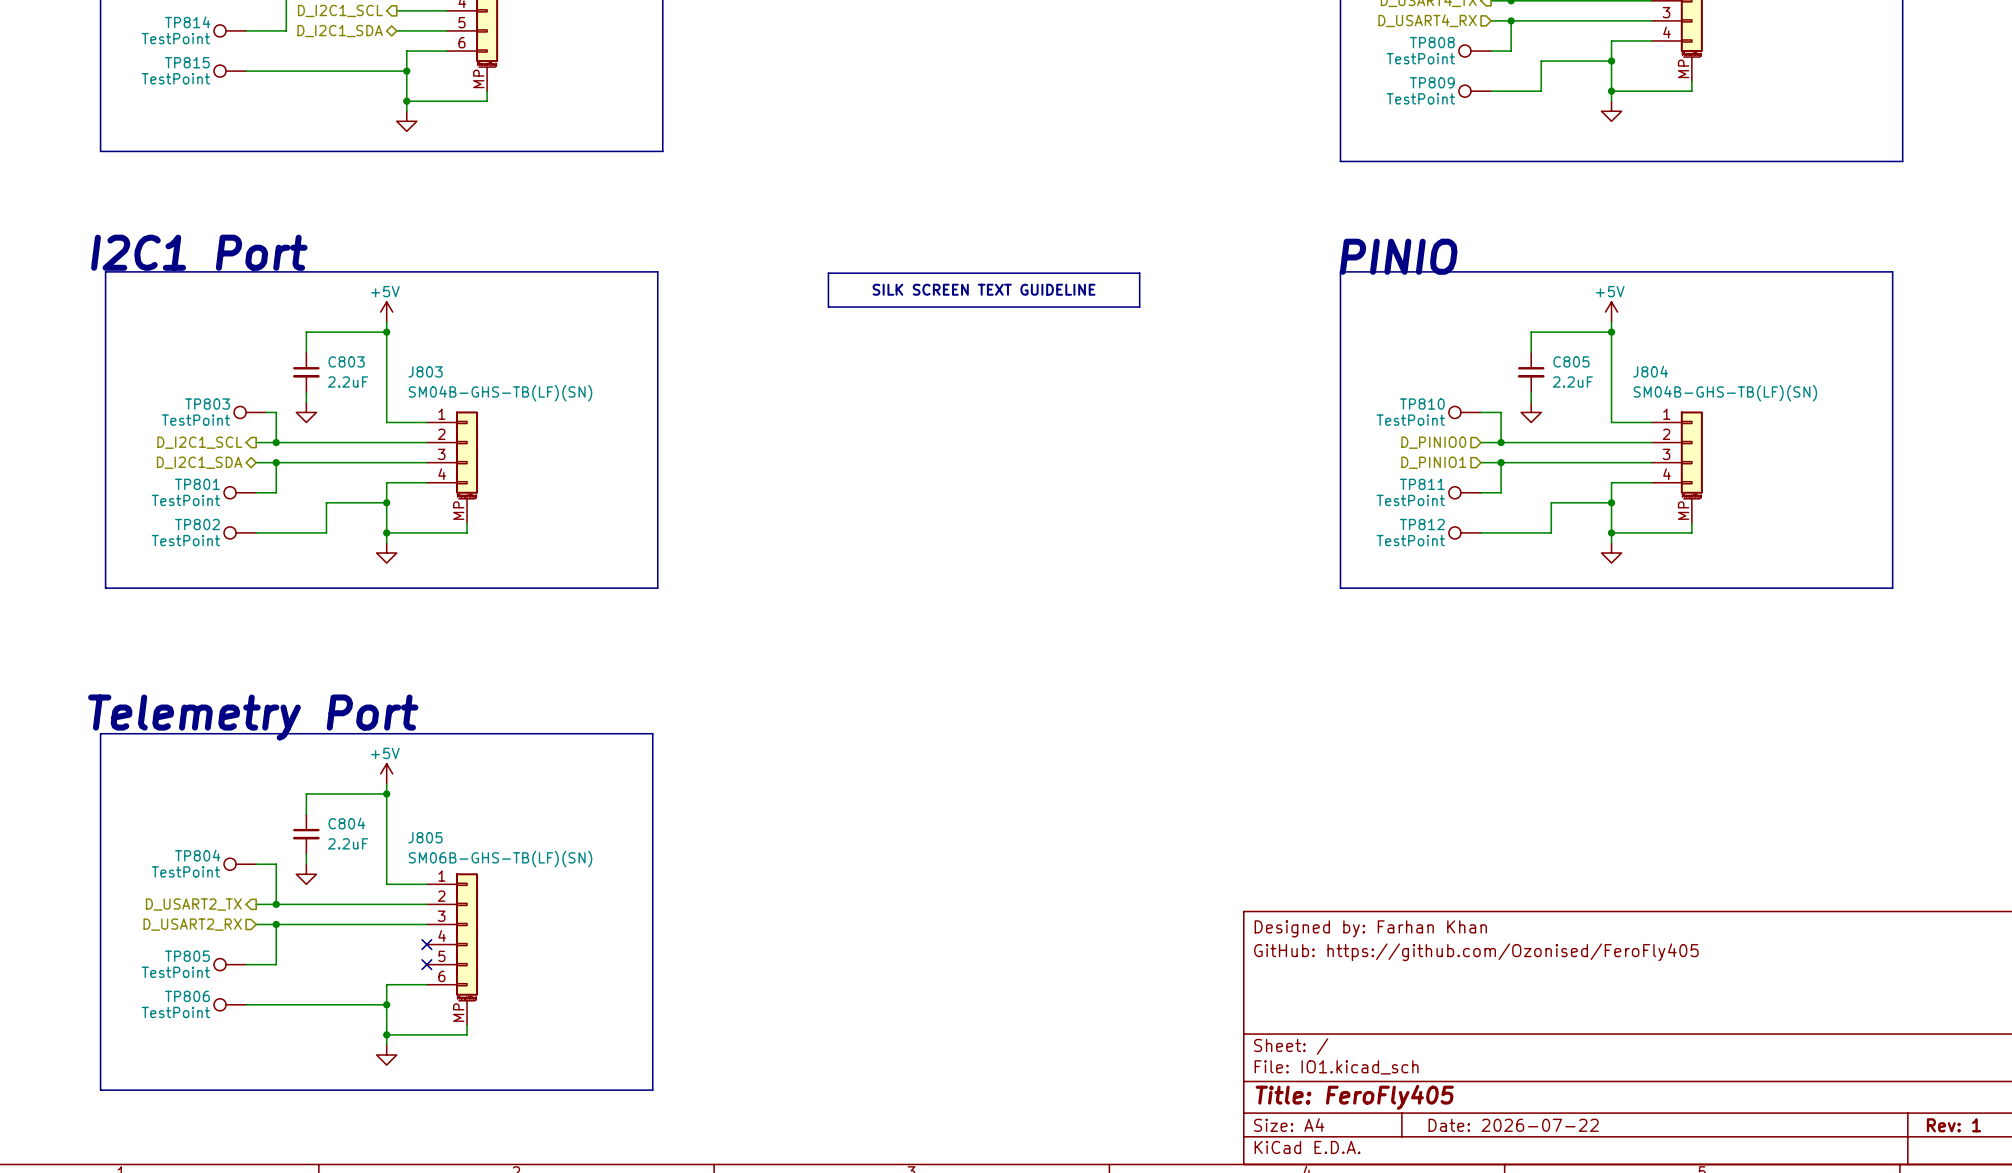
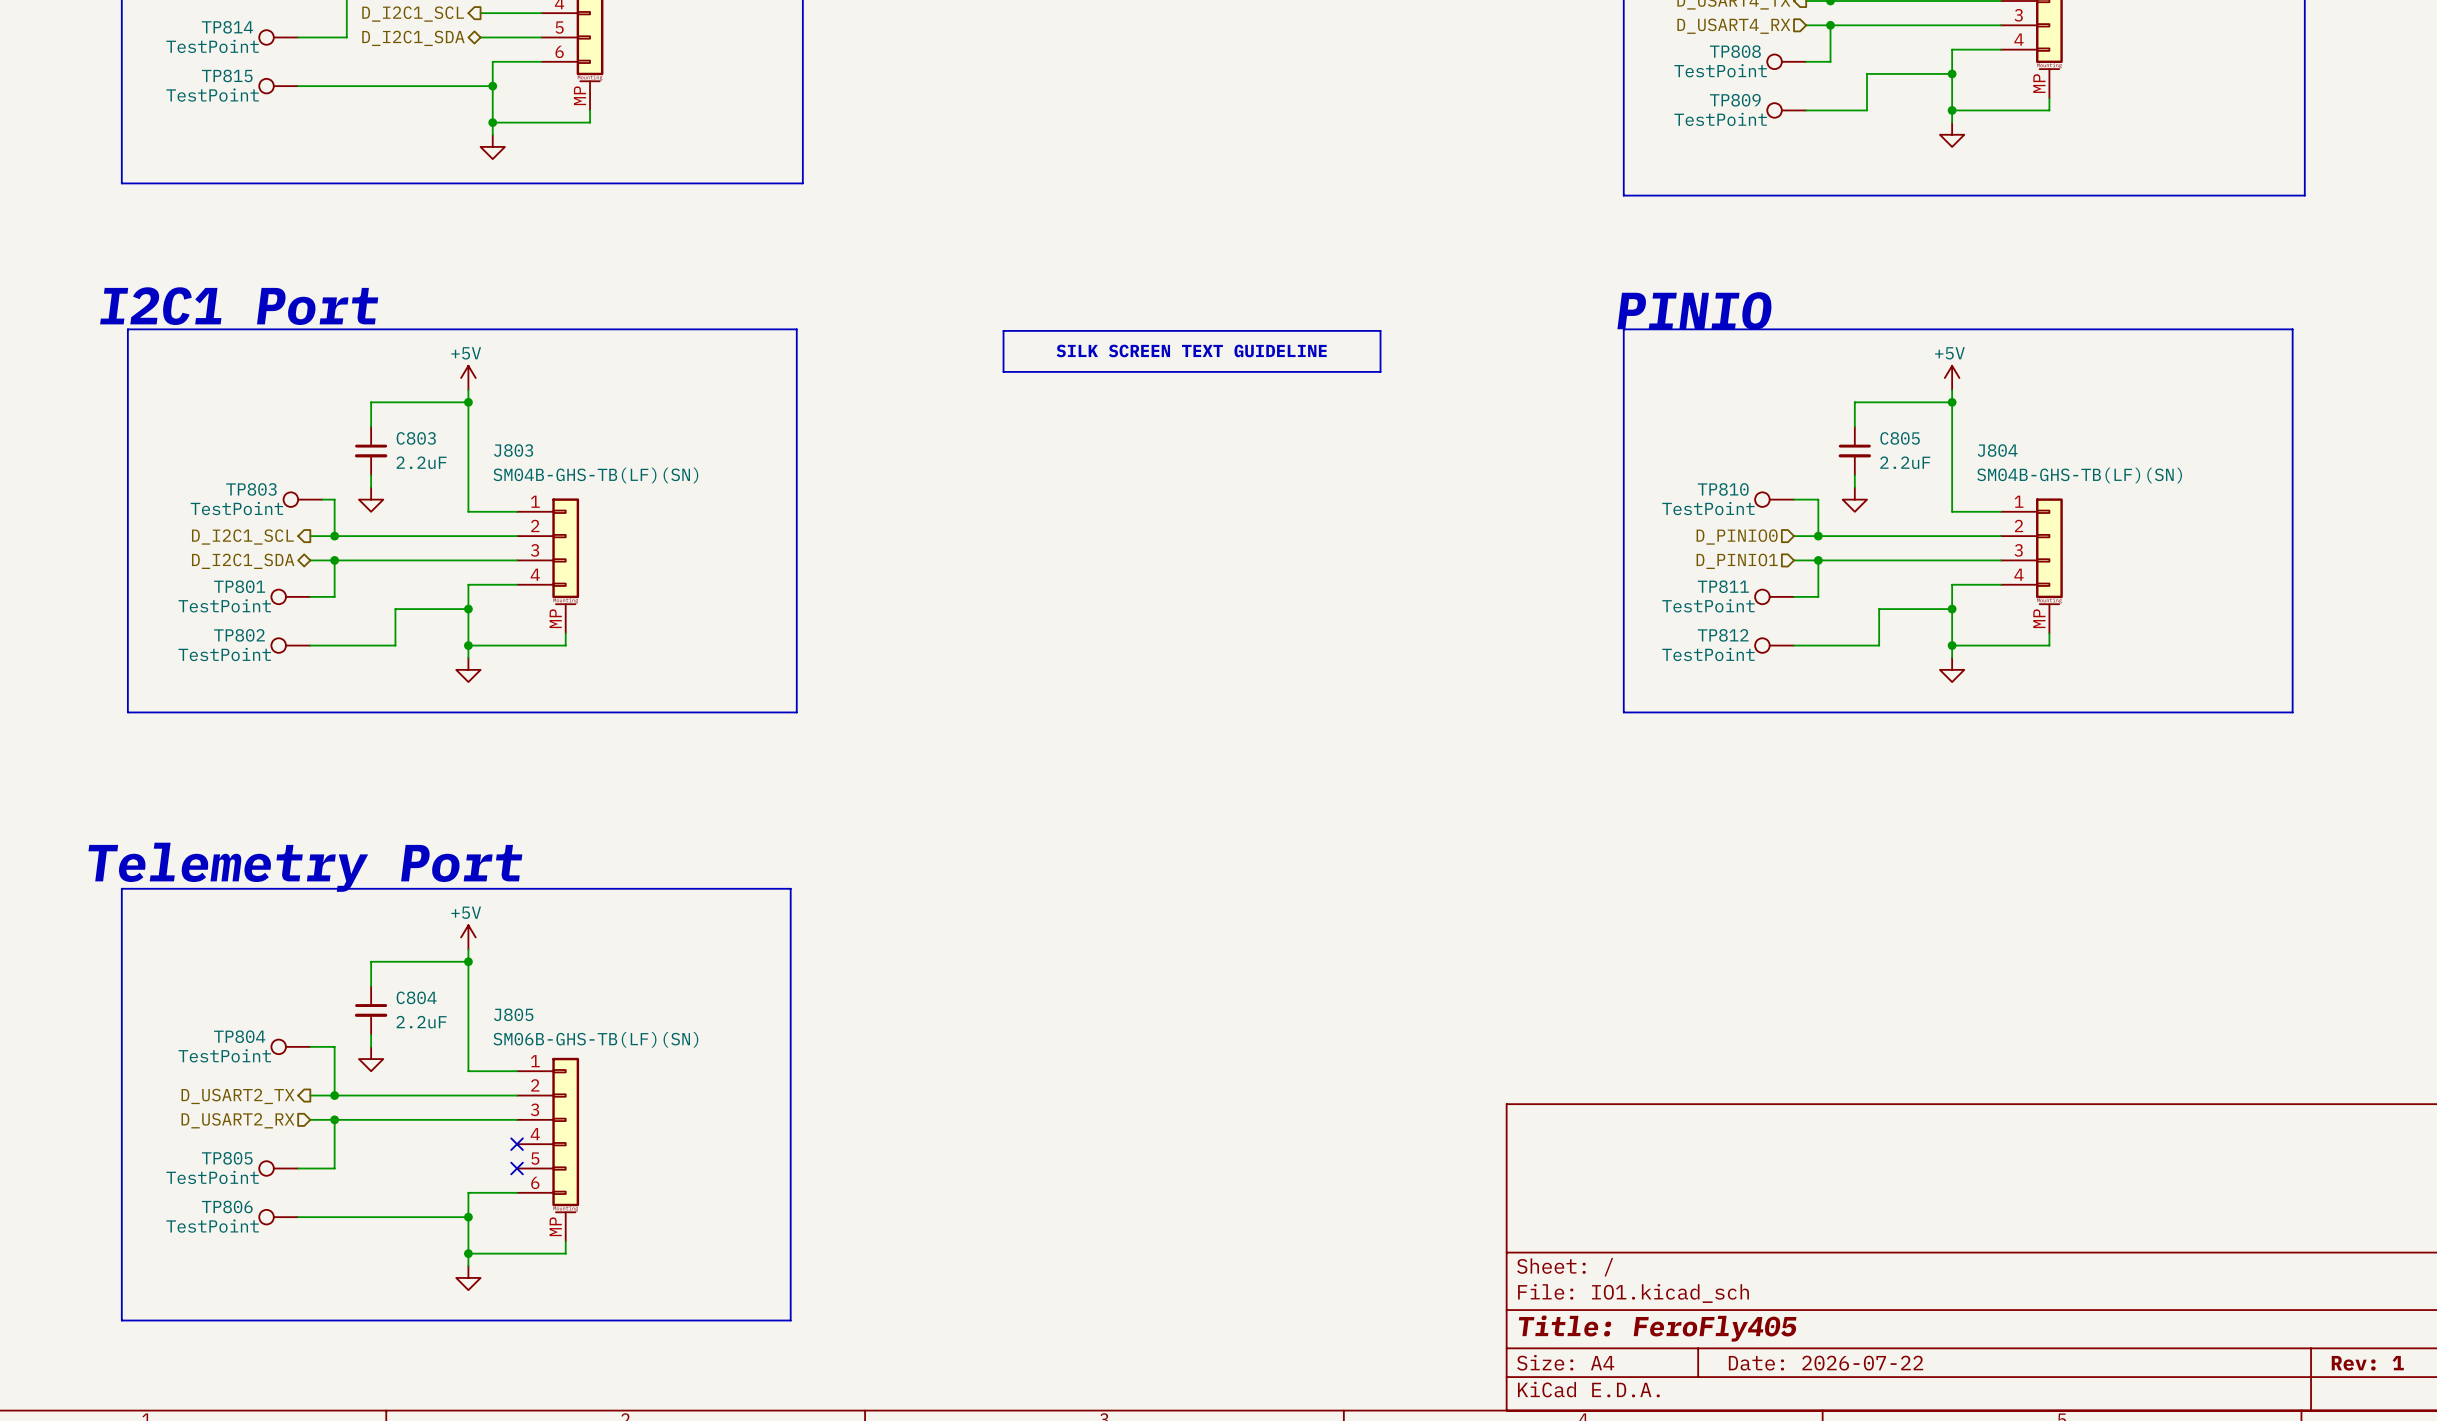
title block: Designed by: Farhan Khan (1370, 928) -> none
title block: GitHub: https://github.com/Ozonised/FeroFly405 (1476, 952) -> none

